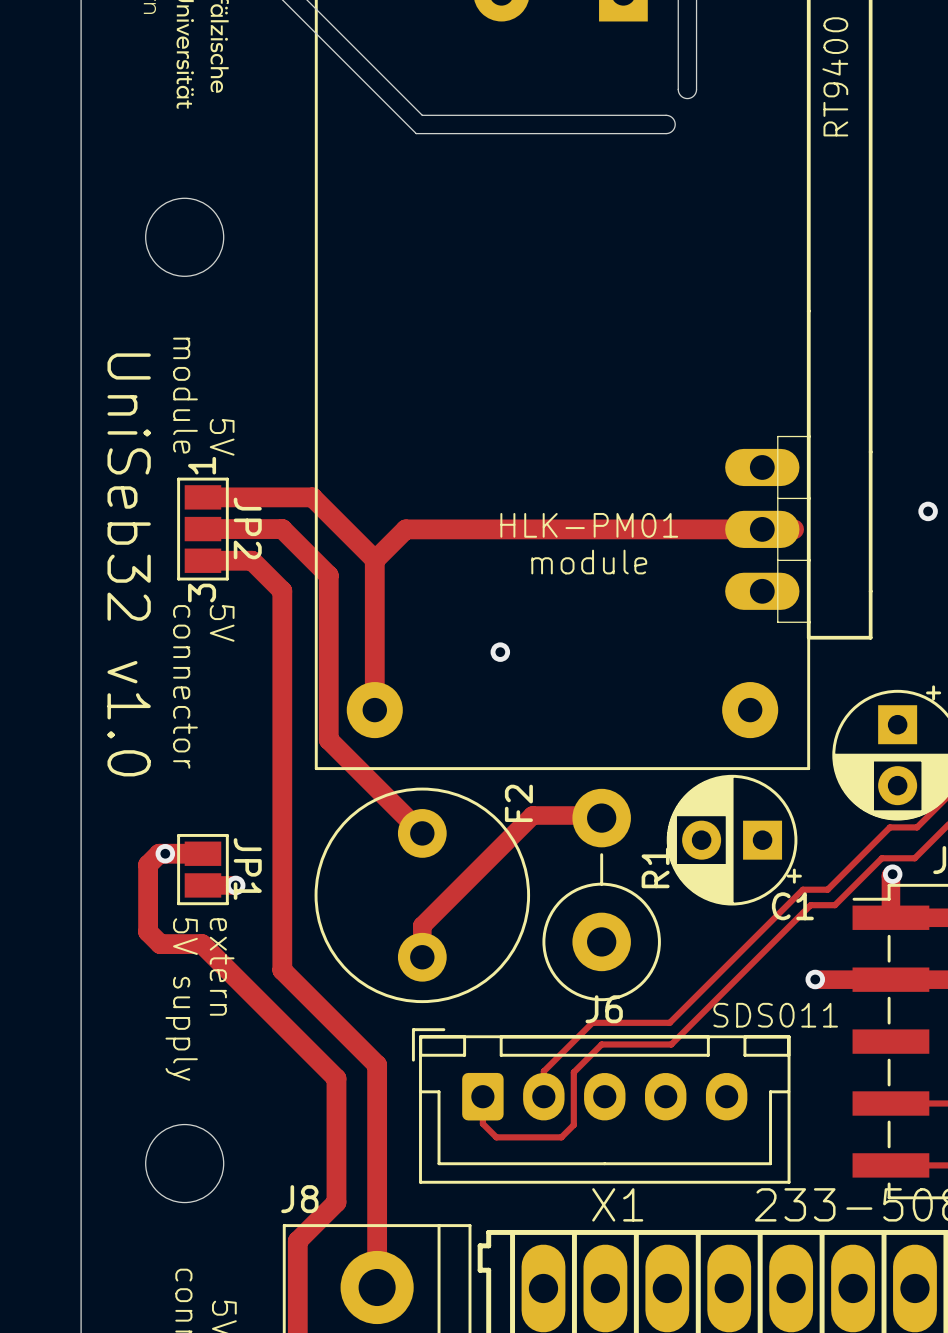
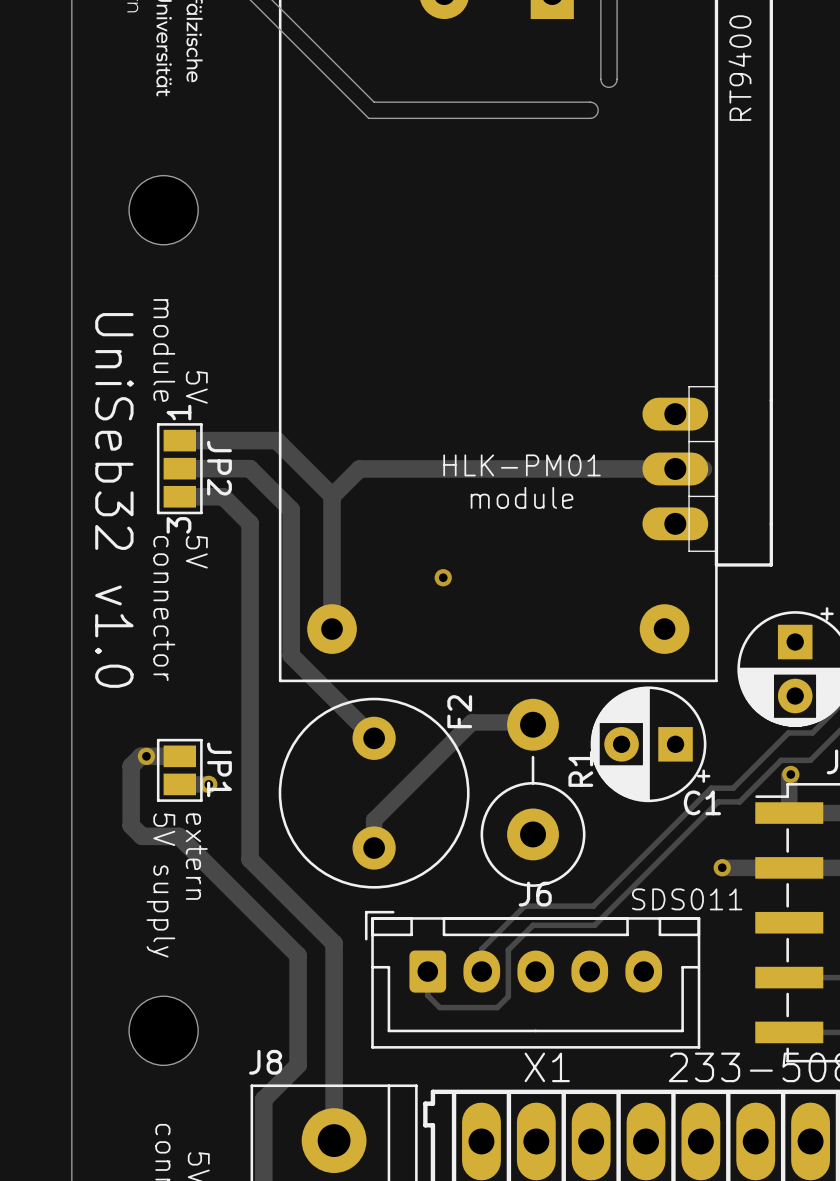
via: (928, 511) -> none

